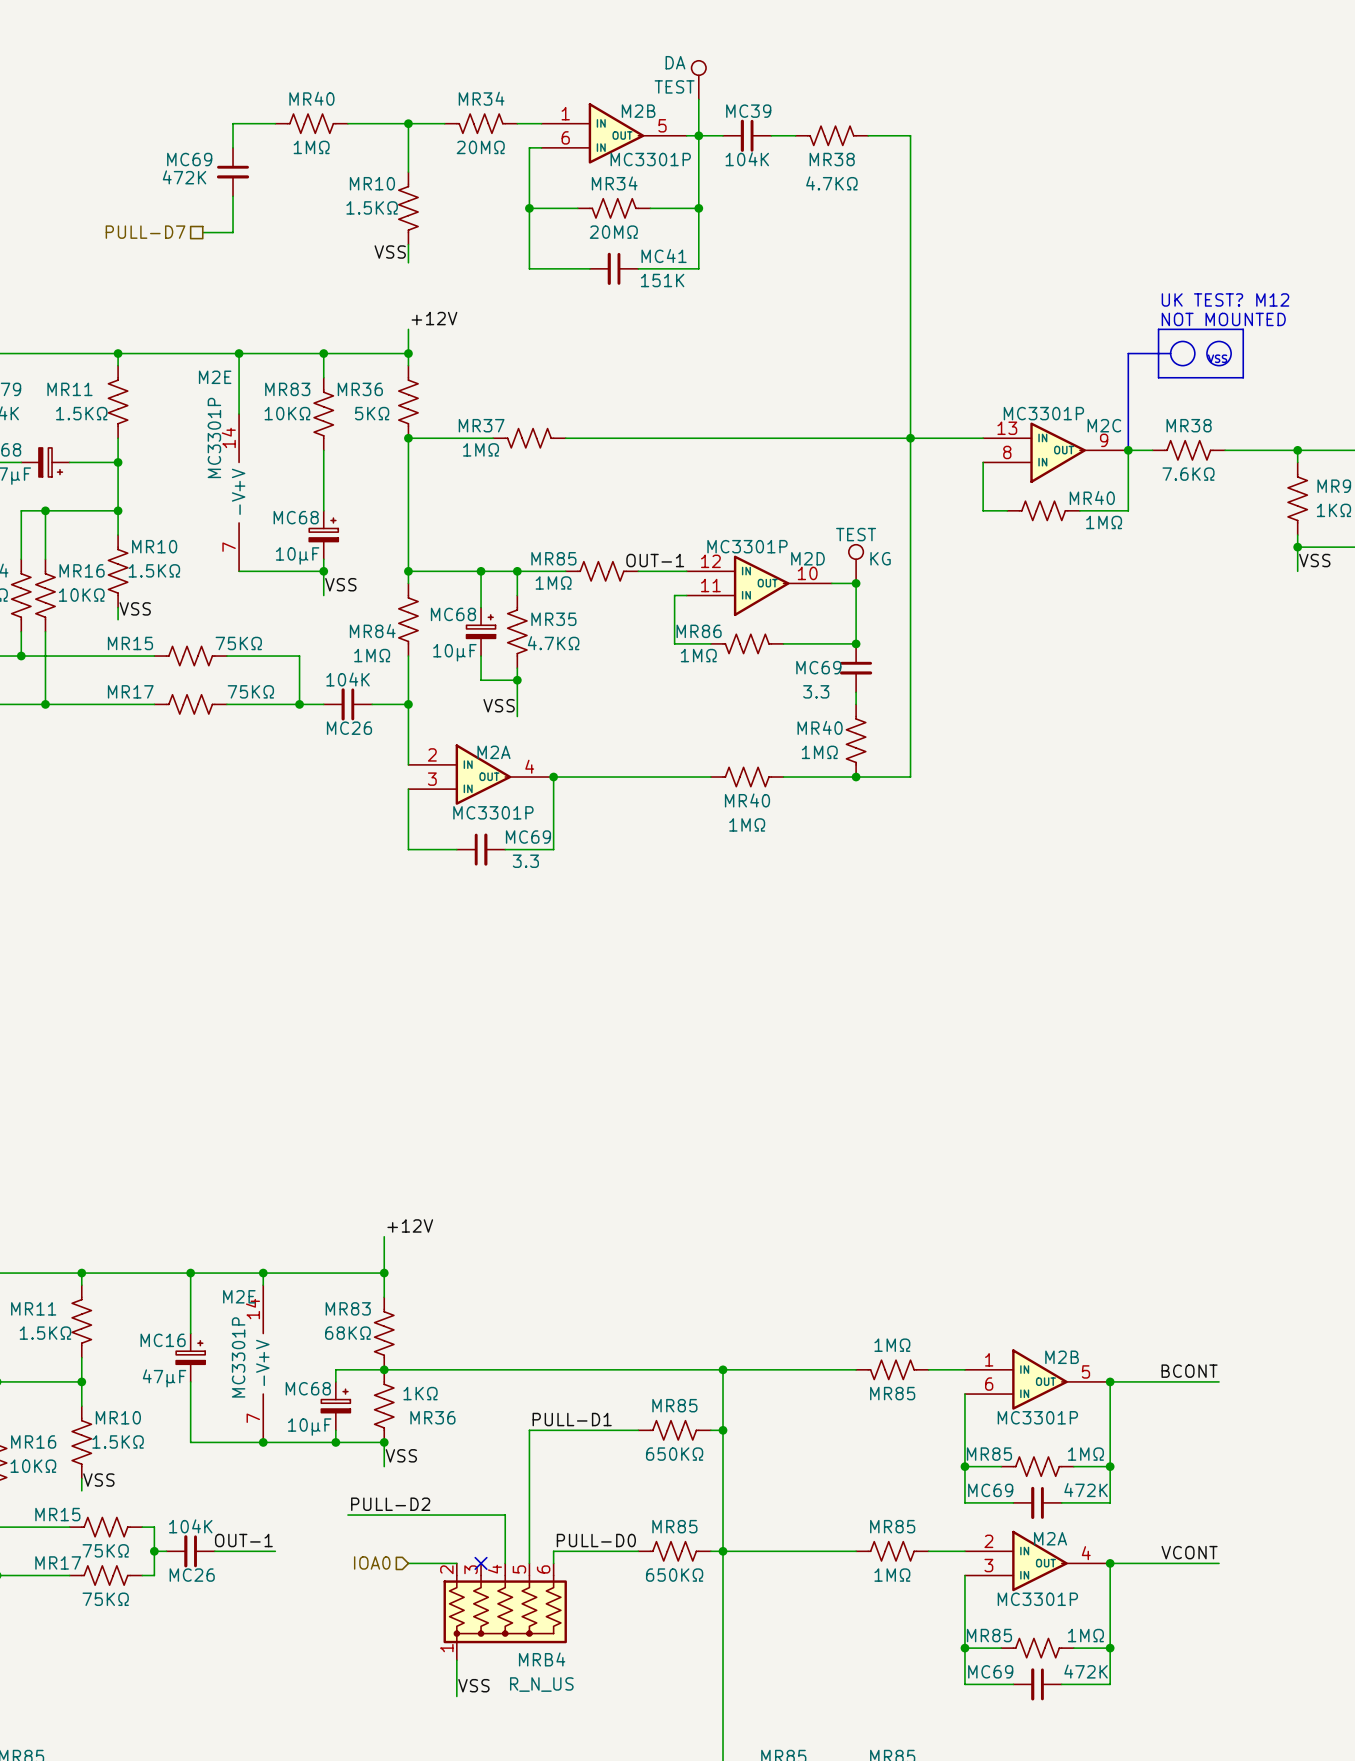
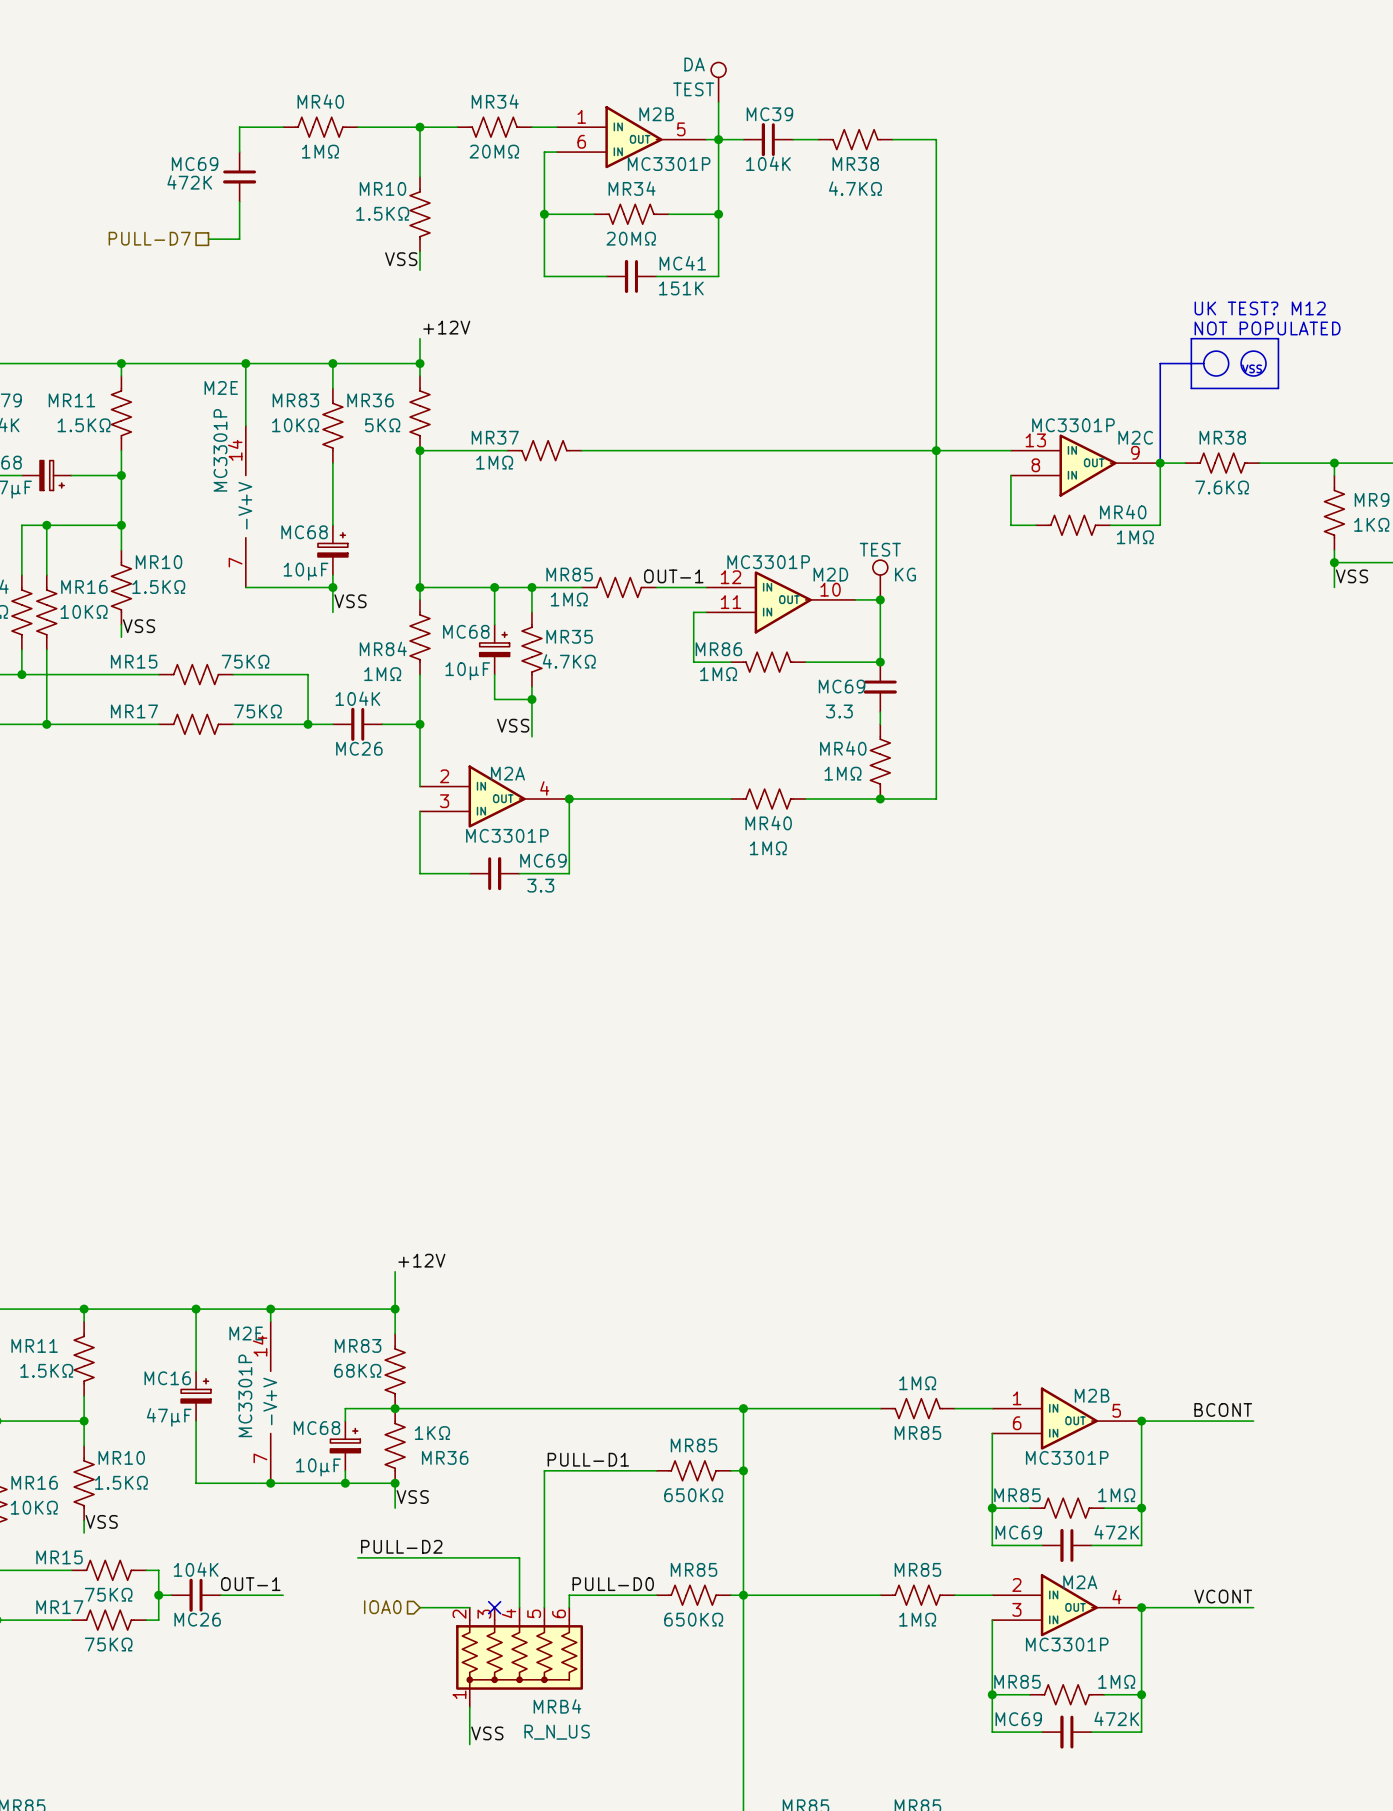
text: NOT MOUNTED (1223, 319) -> NOT POPULATED (1267, 328)

